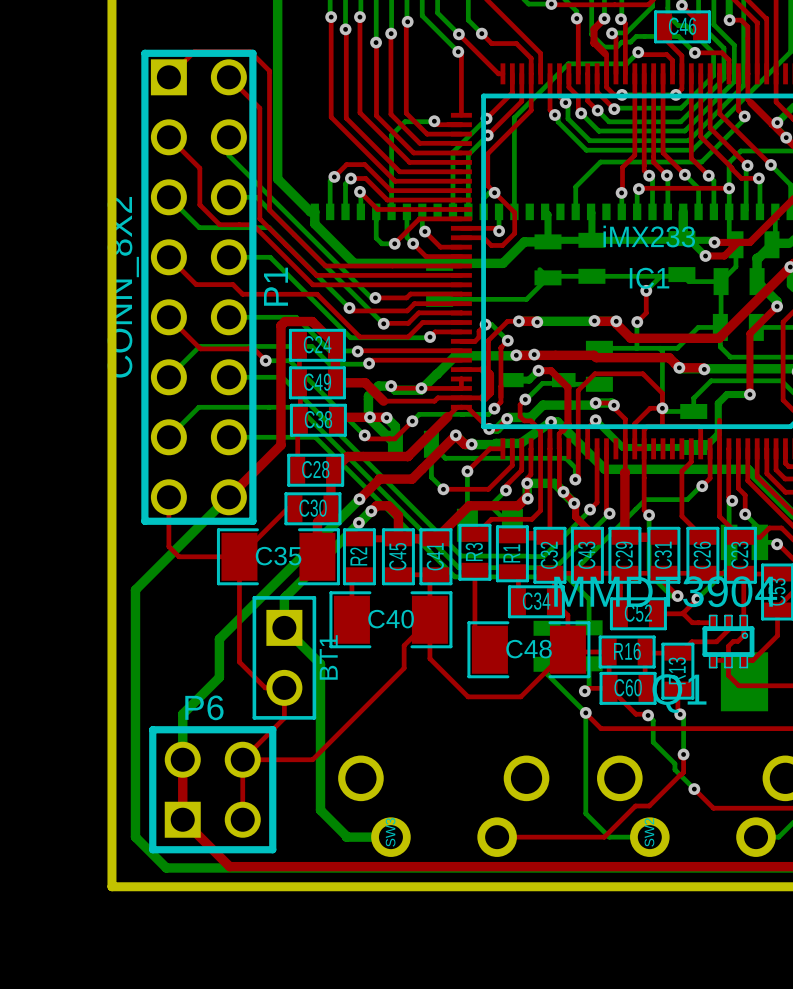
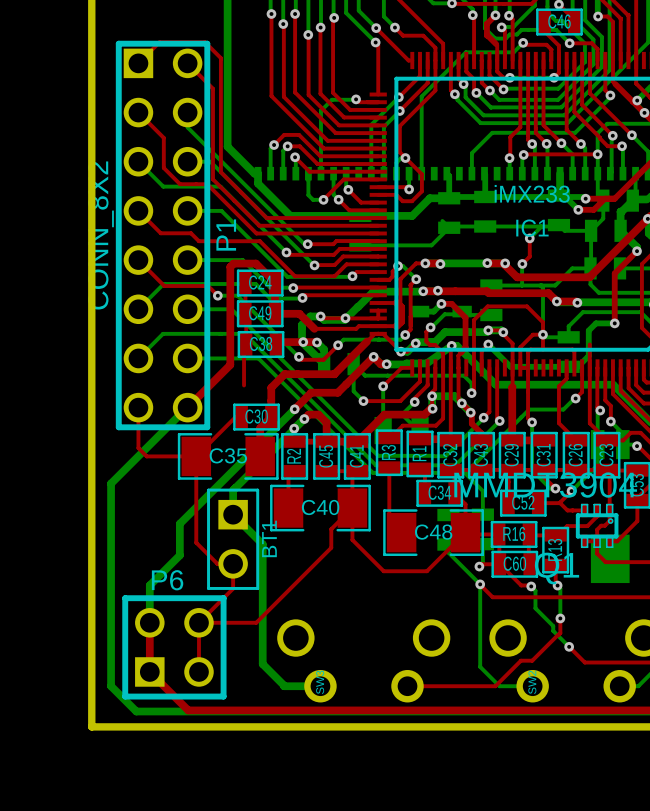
C28: (315, 470) -> none

